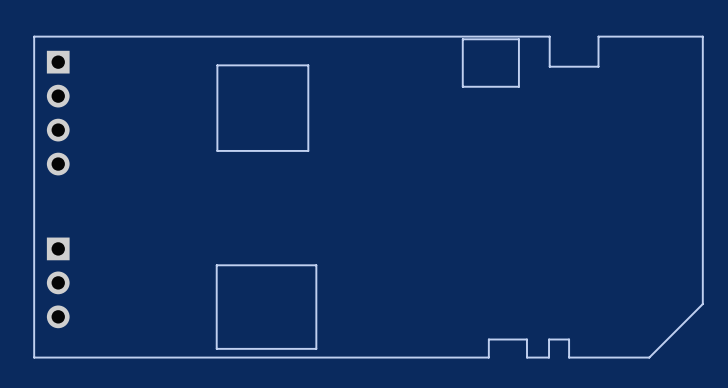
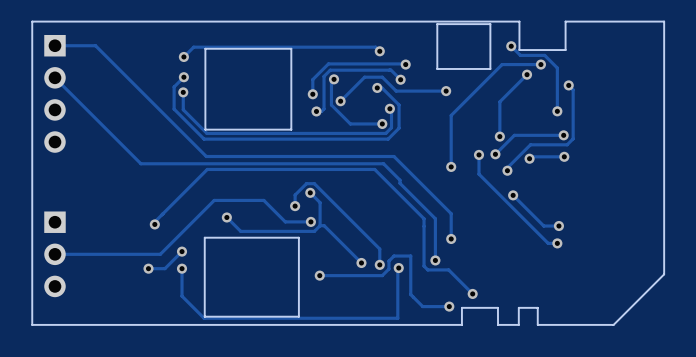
track: none -> (54, 45) (95, 45) (206, 156) (394, 156) (451, 213) (451, 238)
track: none -> (511, 46) (520, 55) (544, 55) (557, 68) (557, 111)
via: none -> (511, 46)
track: none -> (379, 51) (375, 47) (193, 47) (183, 56)
via: none -> (379, 51)
via: none -> (183, 56)
track: none -> (405, 64) (328, 63) (312, 79) (312, 94)
via: none -> (405, 64)
track: none -> (540, 64) (502, 64) (451, 115) (451, 166)
via: none -> (540, 64)
track: none -> (390, 69) (400, 79)
track: none -> (389, 70) (330, 70) (324, 76) (324, 108) (321, 111) (316, 111)
track: none -> (527, 74) (499, 101) (499, 136)
via: none -> (527, 74)
track: none -> (183, 77) (174, 86) (174, 109) (204, 139) (388, 139) (399, 128) (399, 105) (382, 87) (377, 87)
via: none -> (183, 77)
track: none -> (54, 77) (140, 163) (383, 163) (435, 218) (435, 260)
track: none -> (334, 79) (331, 81) (331, 105) (350, 123) (382, 123)
via: none -> (334, 79)
via: none -> (400, 79)
track: none -> (568, 85) (573, 89) (573, 138) (567, 144) (530, 144) (507, 167) (507, 170)
via: none -> (568, 85)
via: none -> (377, 87)
track: none -> (446, 91) (396, 91) (382, 77) (364, 77) (340, 101)
via: none -> (446, 91)
track: none -> (183, 92) (183, 109) (206, 133) (385, 133) (391, 127) (389, 108)
via: none -> (183, 92)
via: none -> (312, 94)
via: none -> (340, 101)
via: none -> (389, 108)
via: none -> (316, 111)
via: none -> (557, 111)
via: none -> (382, 123)
track: none -> (563, 135) (514, 135) (495, 154)
via: none -> (563, 135)
via: none -> (499, 136)
via: none -> (479, 154)
track: none -> (479, 154) (479, 174) (548, 243) (557, 243)
via: none -> (495, 154)
track: none -> (564, 156) (531, 156) (529, 158)
via: none -> (564, 156)
via: none -> (529, 158)
via: none -> (451, 166)
via: none -> (507, 170)
track: none -> (310, 192) (320, 202) (320, 225)
via: none -> (310, 192)
track: none -> (513, 195) (543, 226) (558, 226)
via: none -> (513, 195)
track: none -> (295, 206) (295, 195) (306, 183) (314, 183) (379, 249) (379, 264)
via: none -> (295, 206)
track: none -> (226, 217) (240, 231) (314, 231) (320, 225)
via: none -> (226, 217)
track: none -> (310, 221) (285, 221) (263, 200) (214, 200) (160, 254) (54, 254)
via: none -> (310, 221)
track: none -> (154, 224) (154, 221) (207, 169) (374, 169) (424, 218) (424, 266) (427, 269) (448, 269) (472, 293)
via: none -> (154, 224)
track: none -> (320, 225) (324, 225) (361, 262)
via: none -> (558, 226)
via: none -> (451, 238)
via: none -> (557, 243)
track: none -> (182, 251) (164, 268) (148, 268)
via: none -> (182, 251)
via: none -> (435, 260)
via: none -> (361, 262)
via: none -> (379, 264)
track: none -> (398, 268) (397, 318) (204, 318) (182, 296) (182, 268)
via: none -> (398, 268)
via: none -> (148, 268)
via: none -> (182, 268)
track: none -> (319, 275) (382, 275) (388, 268) (388, 261) (394, 256) (410, 256) (410, 294) (422, 306) (449, 306)
via: none -> (319, 275)
via: none -> (472, 293)
via: none -> (449, 306)

